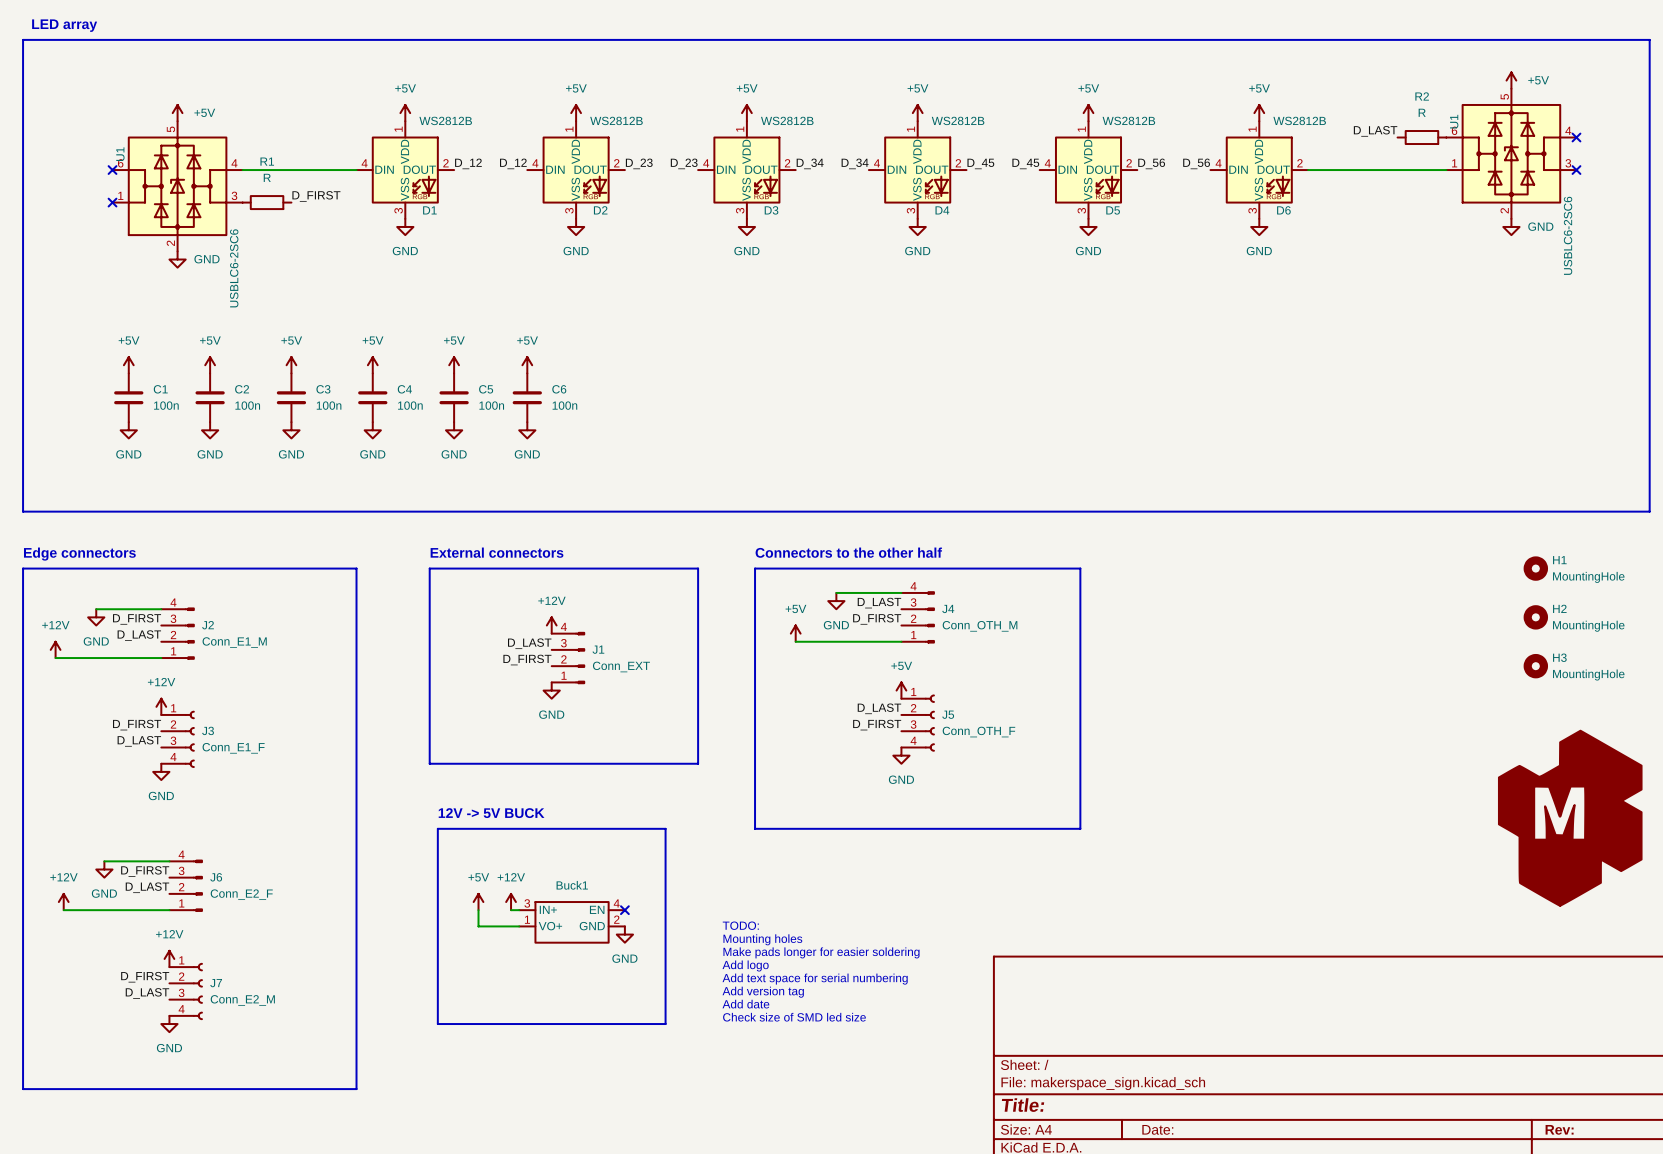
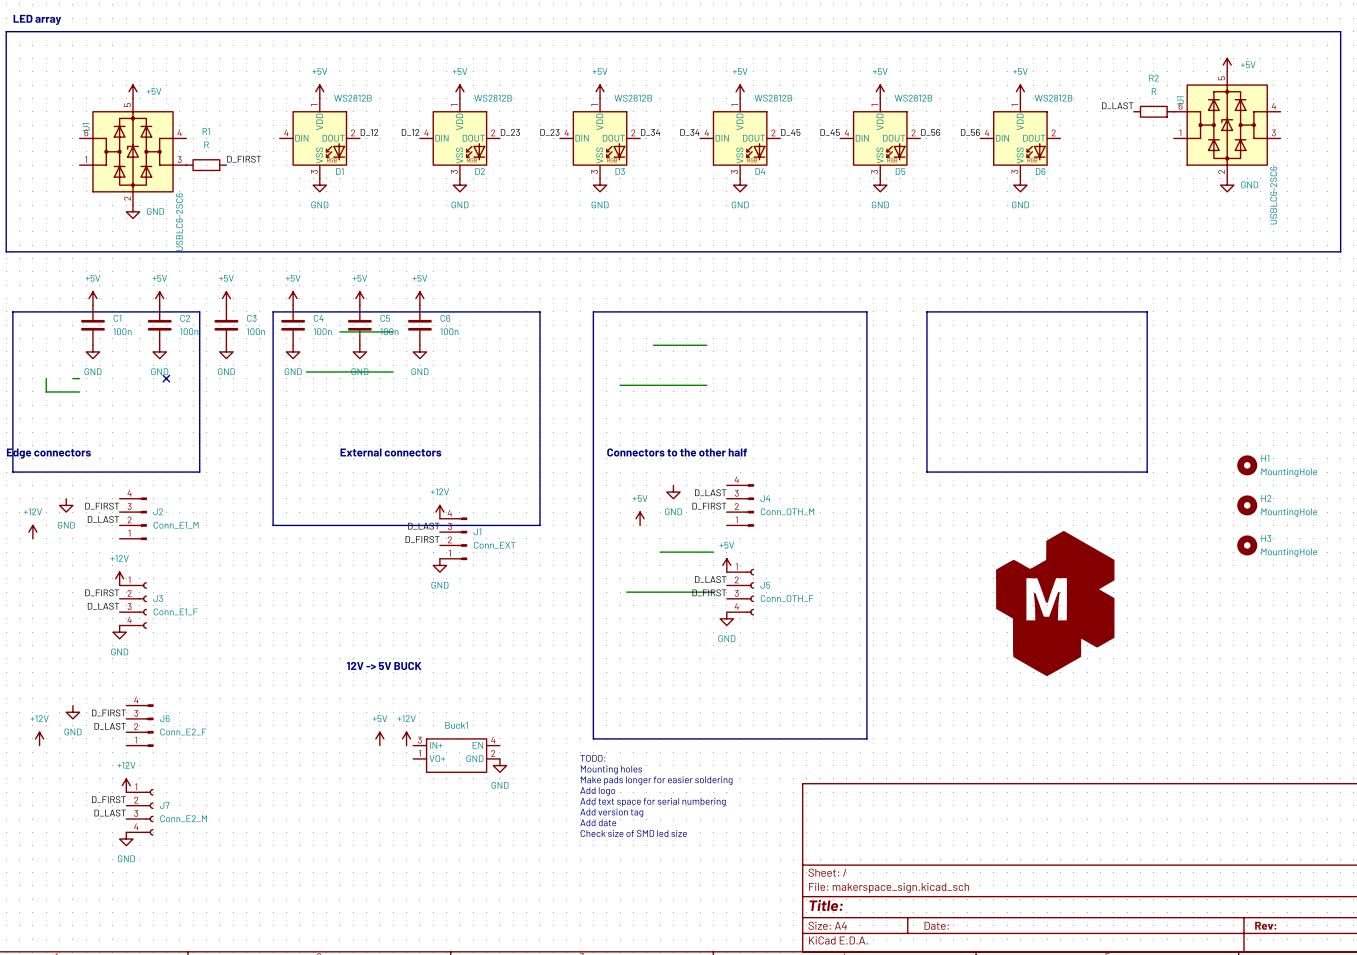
no-connect mark: (1576, 137) -> none
no-connect mark: (112, 170) -> none
wire: (242, 170) (356, 170) -> none
wire: (1308, 170) (1446, 170) -> none
no-connect mark: (1576, 170) -> none
no-connect mark: (112, 202) -> none
line: (23, 308) (23, 511) (1649, 511) (1649, 308) -> (6, 251) (1340, 251)
line: none -> (12, 311) (199, 311) (199, 472) (12, 472) (12, 311)
line: none -> (273, 311) (539, 311) (539, 525) (273, 525) (273, 311)
line: none -> (593, 311) (866, 311) (866, 738) (593, 738) (593, 311)
line: none -> (926, 311) (1147, 311) (1147, 472) (926, 472) (926, 311)
wire: none -> (339, 331) (393, 331)
wire: none -> (653, 345) (706, 345)
wire: none -> (306, 371) (393, 371)
wire: none -> (46, 378) (46, 391) (79, 391)
wire: none -> (72, 378) (79, 378)
no-connect mark: none -> (166, 378)
wire: none -> (620, 385) (706, 385)
line: (23, 568) (356, 568) (356, 1089) (23, 1089) (23, 568) -> none
line: (429, 568) (698, 568) (698, 763) (429, 763) (429, 568) -> none
line: (755, 568) (1080, 568) (1080, 828) (755, 828) (755, 568) -> none
wire: (836, 592) (901, 592) -> (660, 552) (713, 552)
wire: (96, 609) (161, 609) -> none
wire: (795, 641) (901, 641) -> (626, 592) (713, 592)
wire: (55, 658) (161, 658) -> none
part: none -> (1055, 603)
part: (1570, 818) -> none
line: (437, 828) (665, 828) (665, 1024) (437, 1024) (437, 828) -> none
wire: (104, 861) (169, 861) -> none
wire: (63, 910) (169, 910) -> none
wire: (478, 910) (478, 926) (519, 926) -> none
wire: (511, 910) (519, 910) -> none
no-connect mark: (624, 910) -> none

